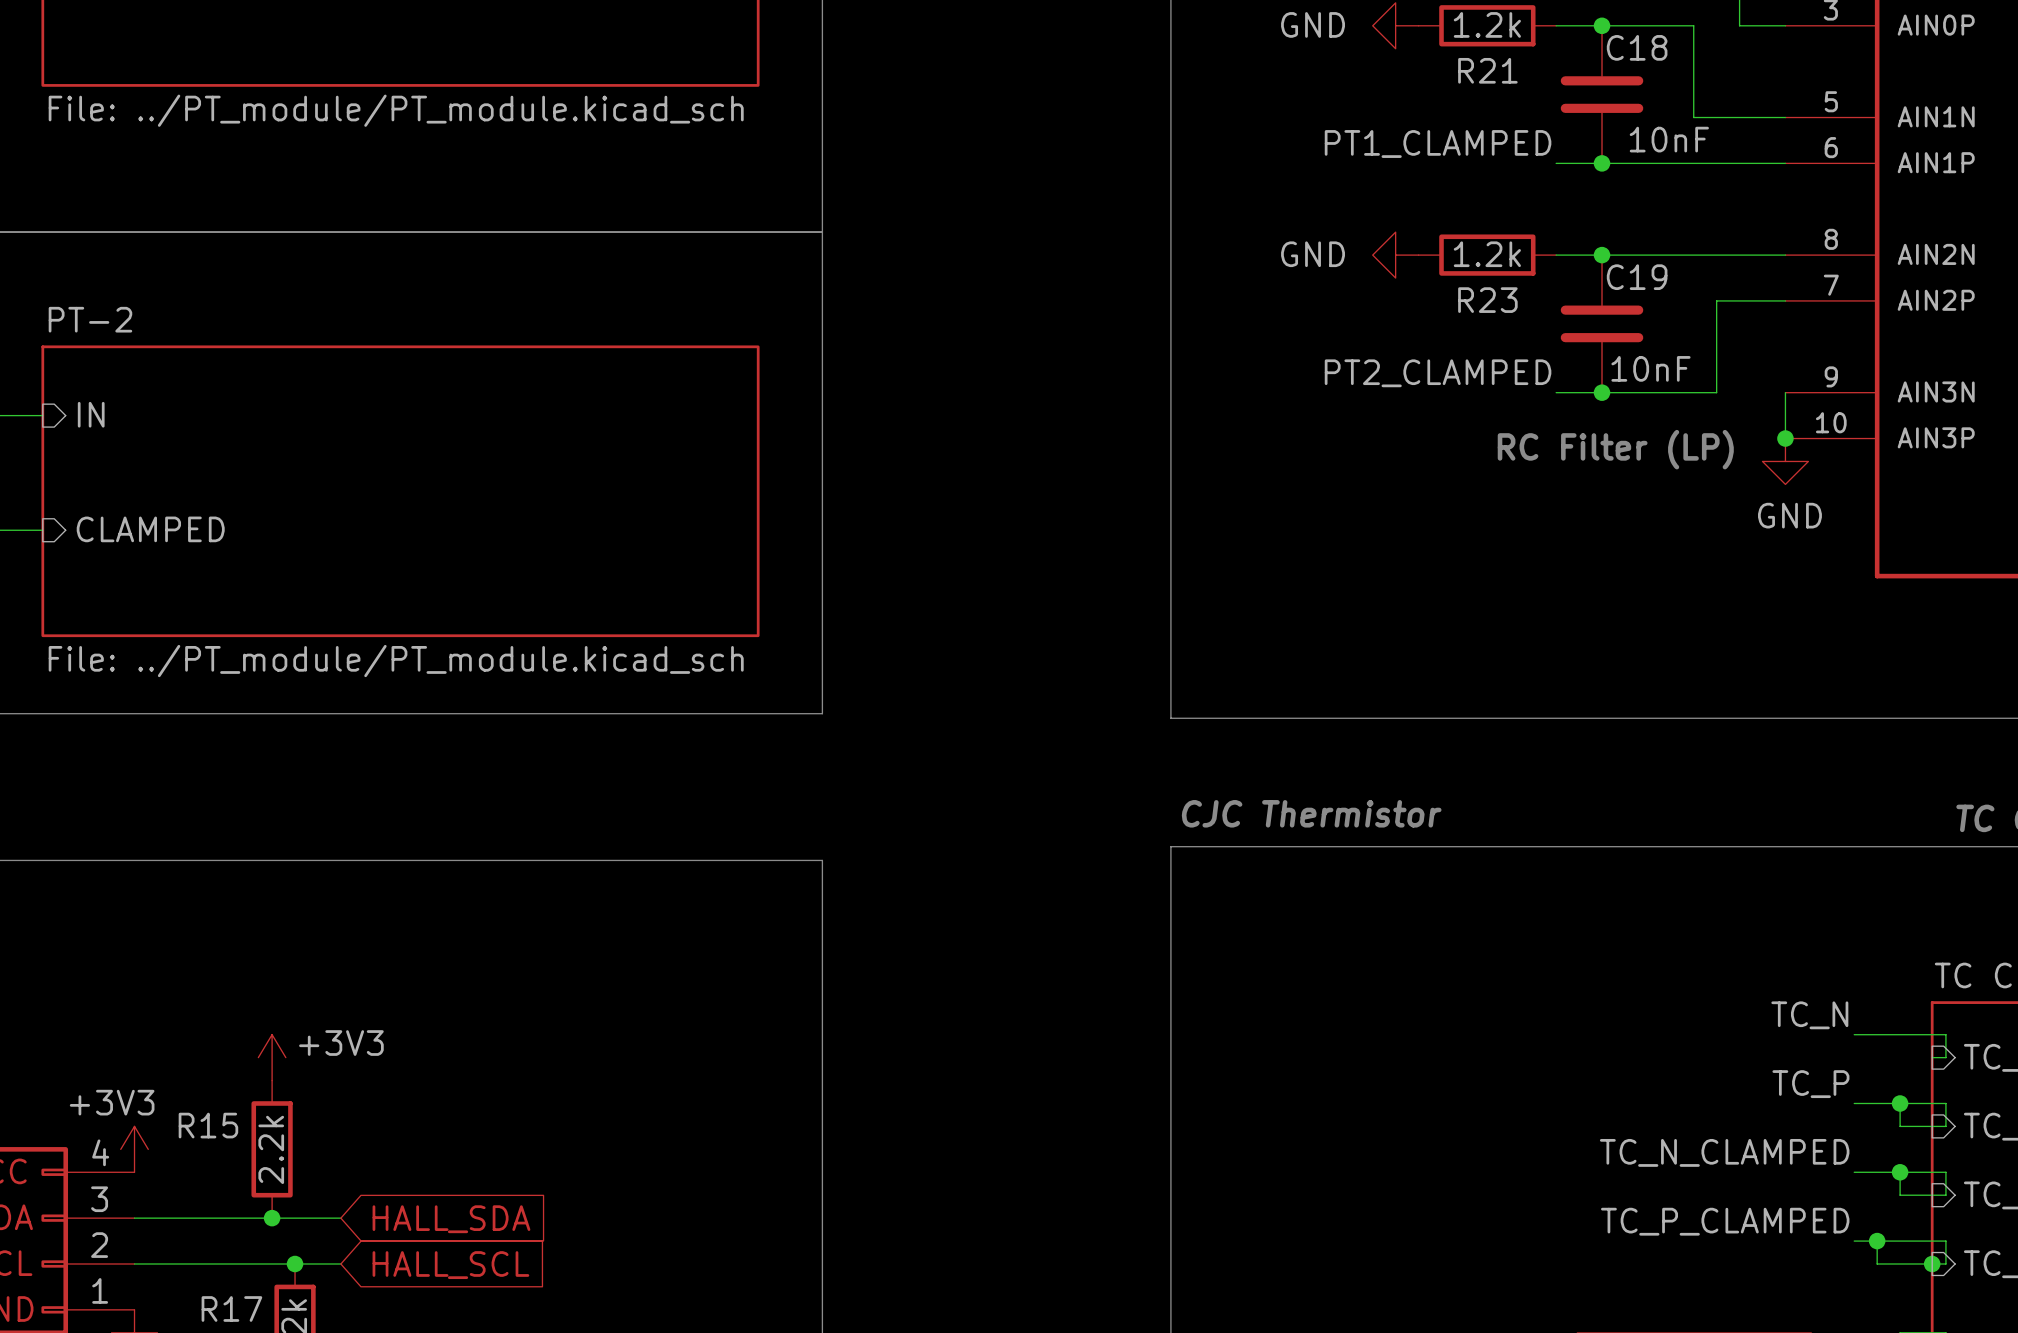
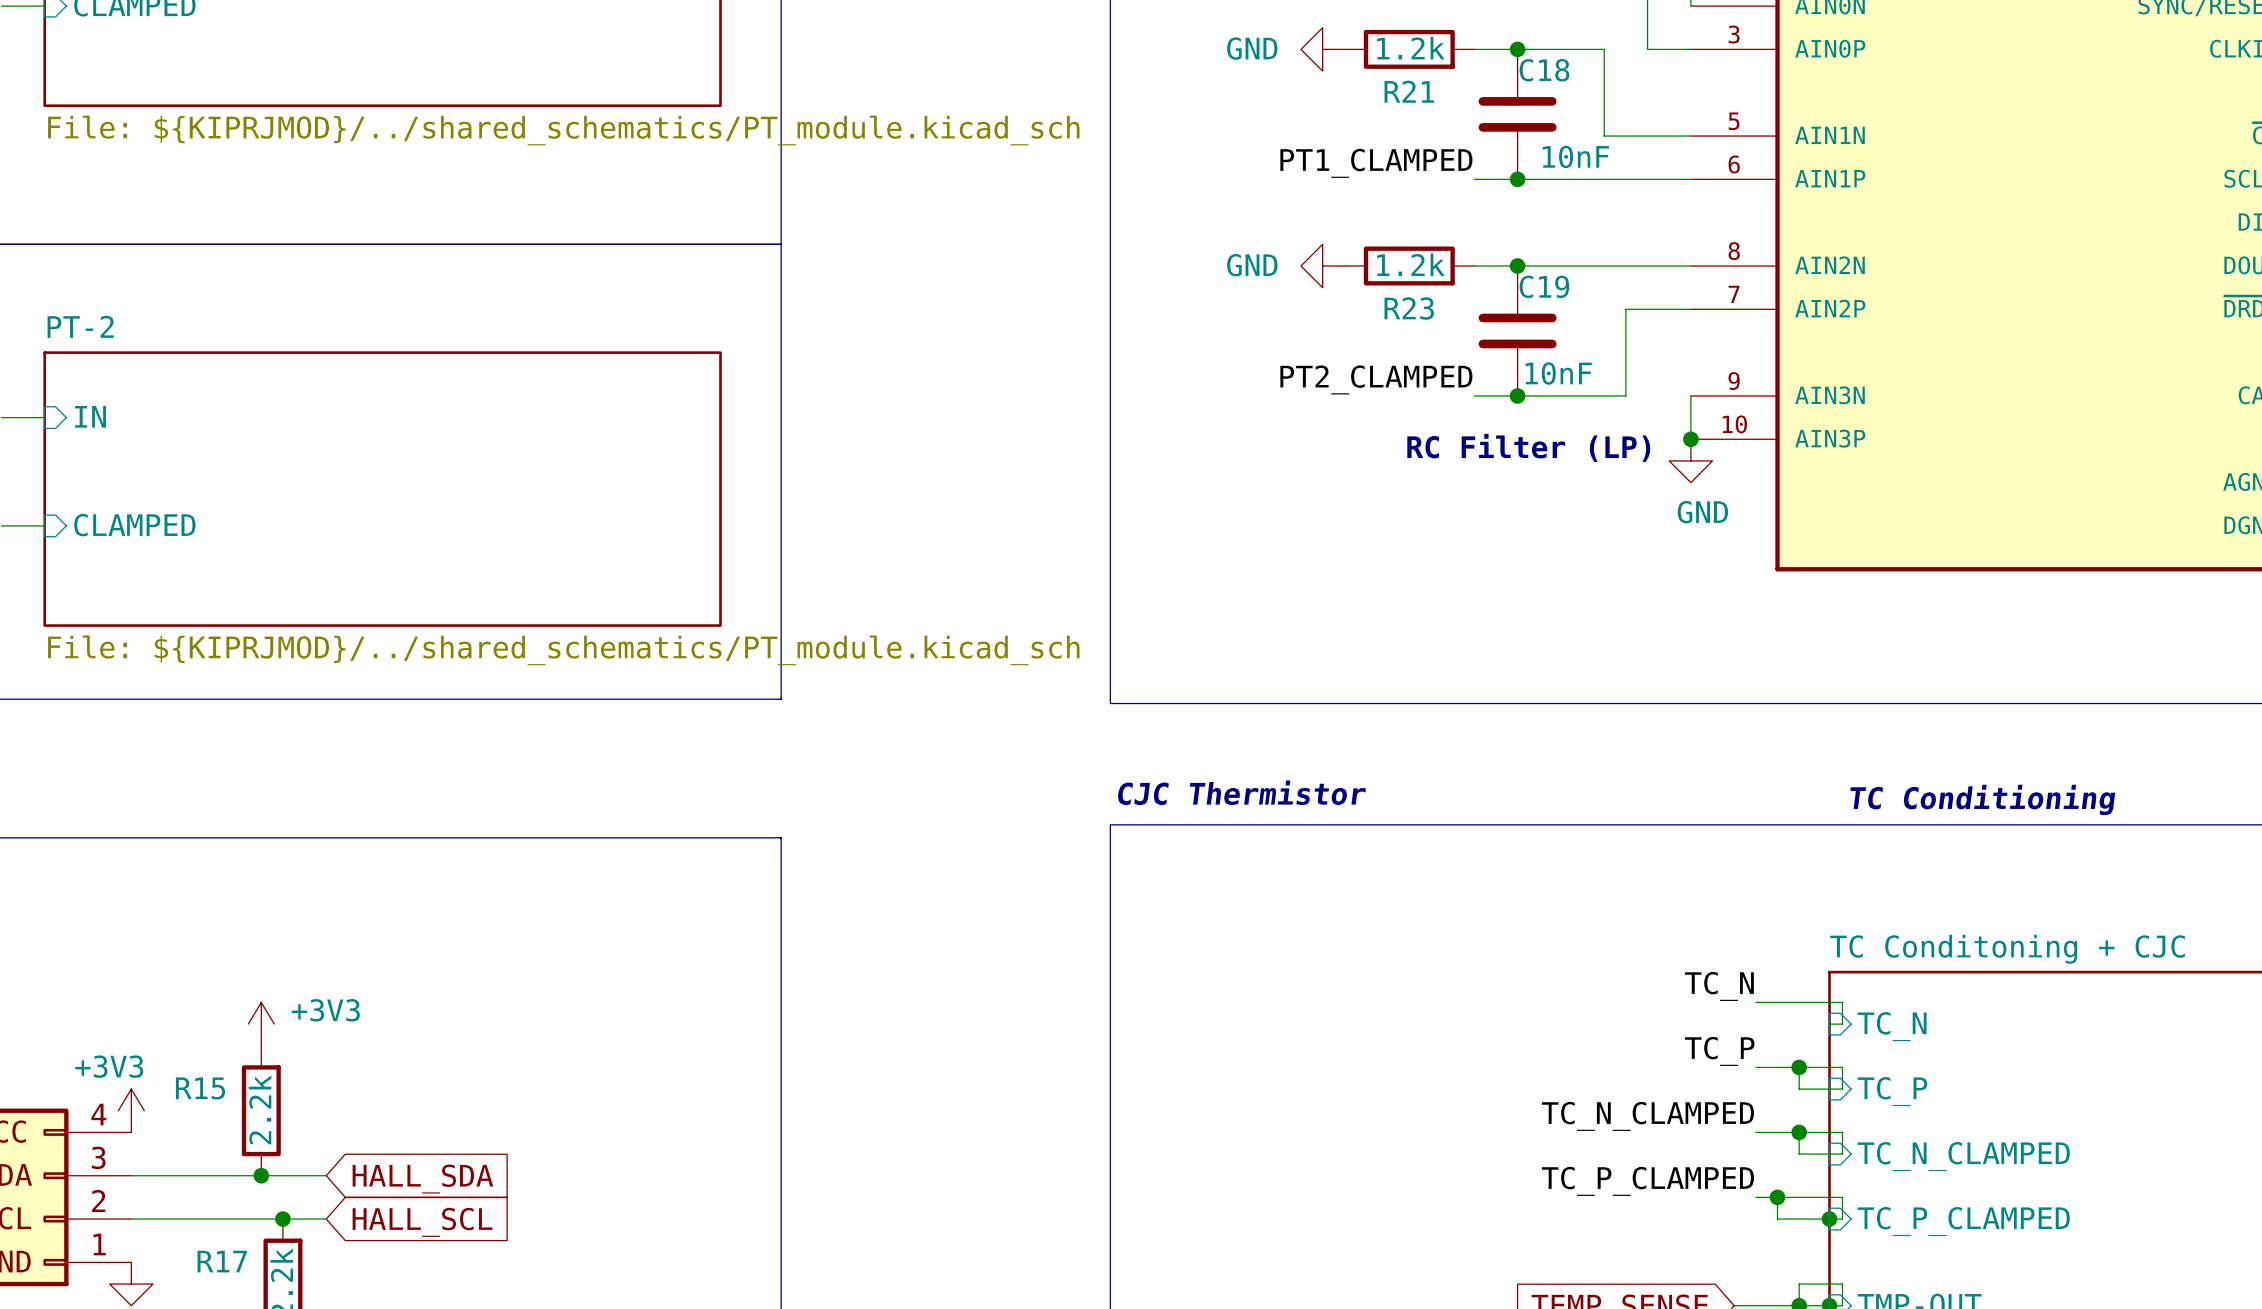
sheet value: File: ../PT_module/PT_module.kicad_sch (396, 110) -> File: ${KIPRJMOD}/../shared_schematics/PT_module.kicad_sch (563, 130)
sheet PT-2 value: File: ../PT_module/PT_module.kicad_sch (396, 661) -> File: ${KIPRJMOD}/../shared_schematics/PT_module.kicad_sch (563, 650)

